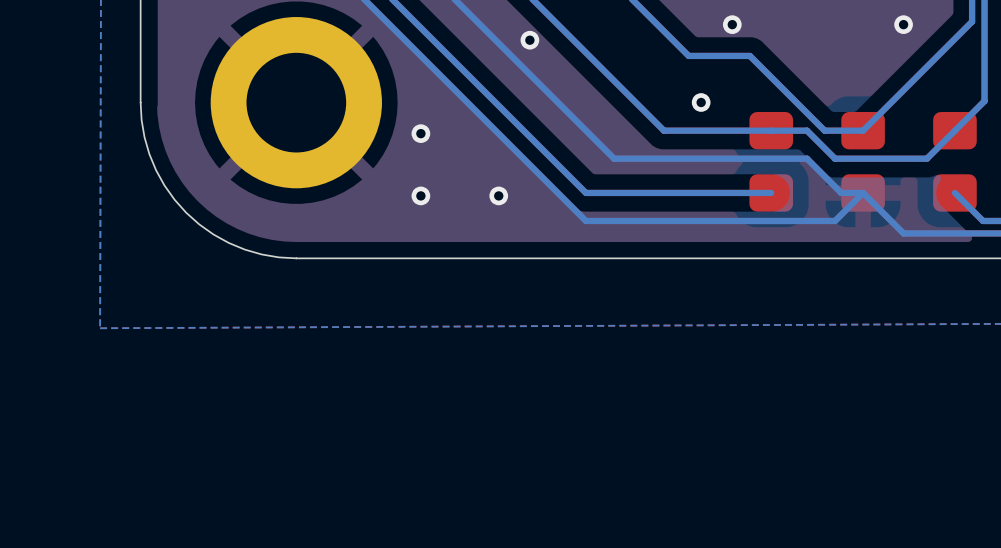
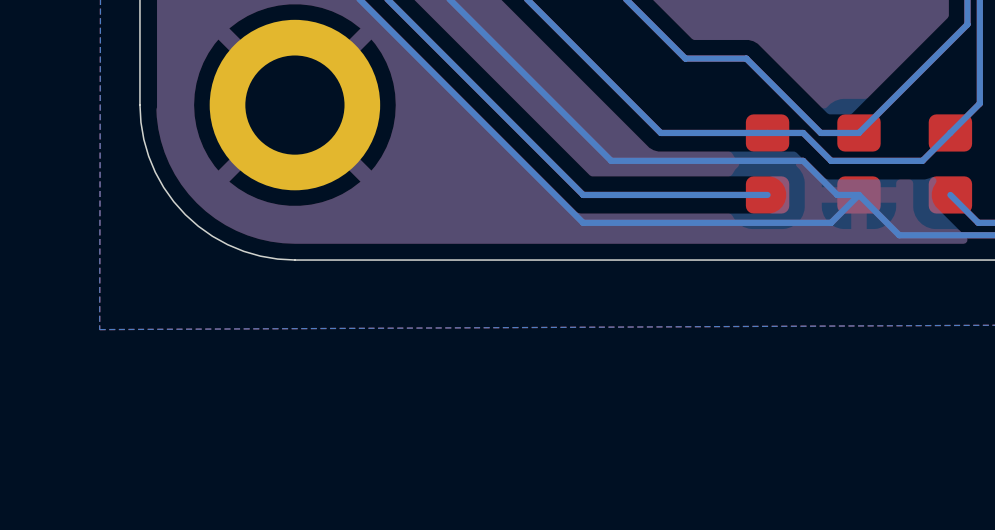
via: (732, 24) -> none
via: (903, 24) -> none
via: (529, 40) -> none
via: (701, 102) -> none
via: (420, 133) -> none
via: (420, 195) -> none
via: (498, 195) -> none

